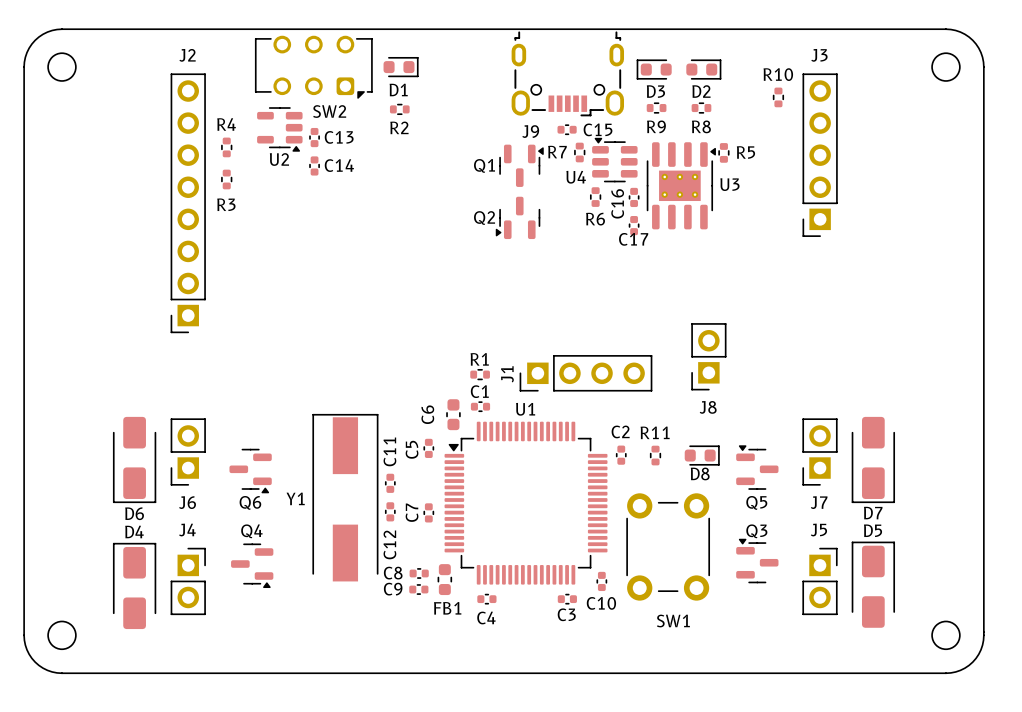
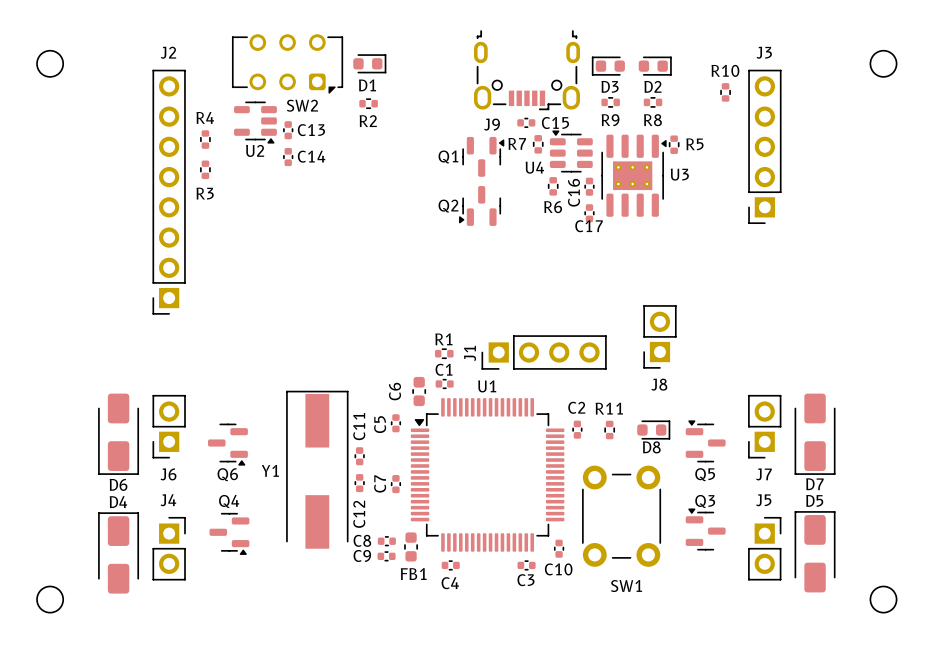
board edge: (61, 29) (945, 29) (955, 30) (969, 37) (978, 48) (983, 67) (983, 635) (980, 649) (976, 658) (964, 668) (945, 673) (61, 673) (52, 671) (38, 665) (26, 649) (24, 635) (24, 67) (26, 52) (35, 40) (47, 32) (61, 29) -> none

